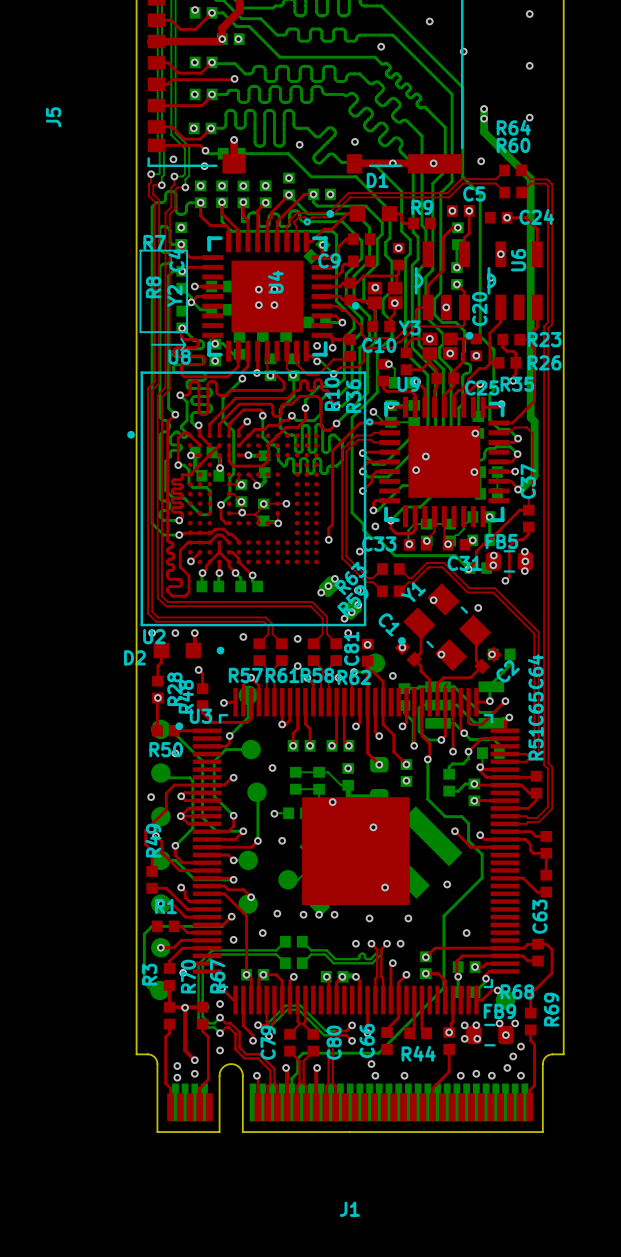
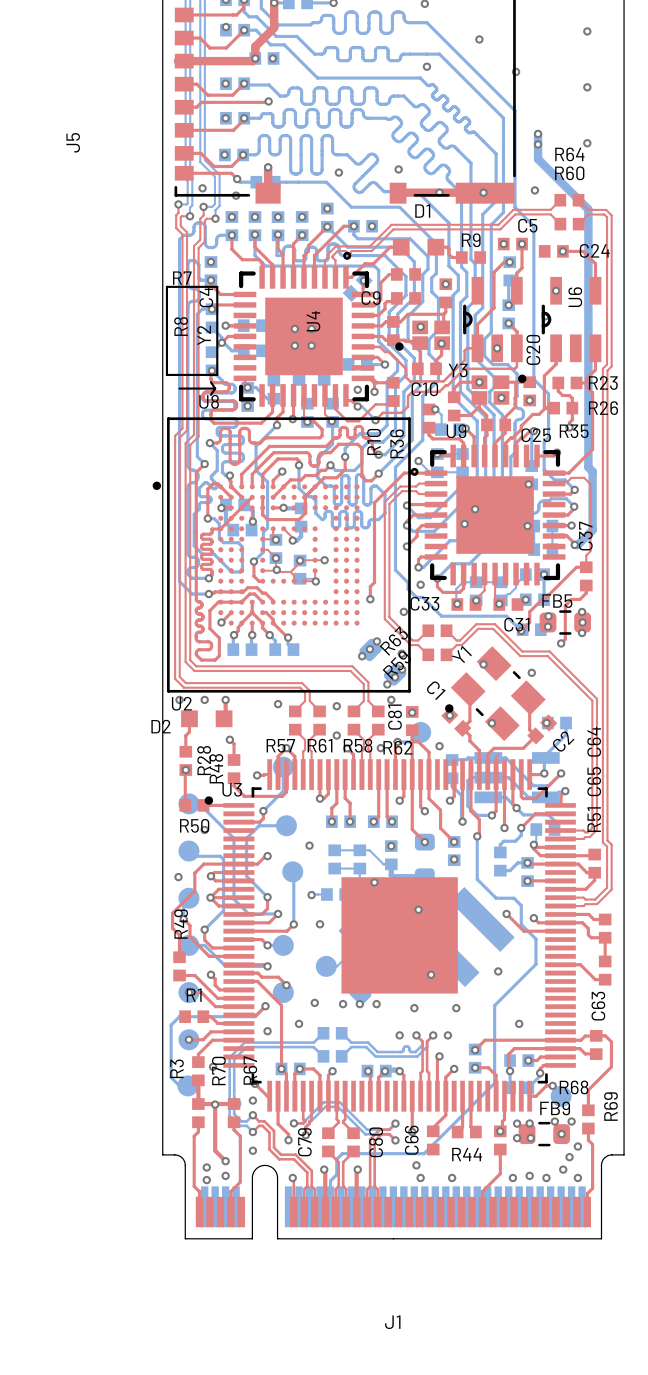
D1 footprint: [326, 206, 398, 222] -> [392, 238, 445, 256]
D2 footprint: [153, 642, 225, 659] -> [181, 710, 233, 728]

